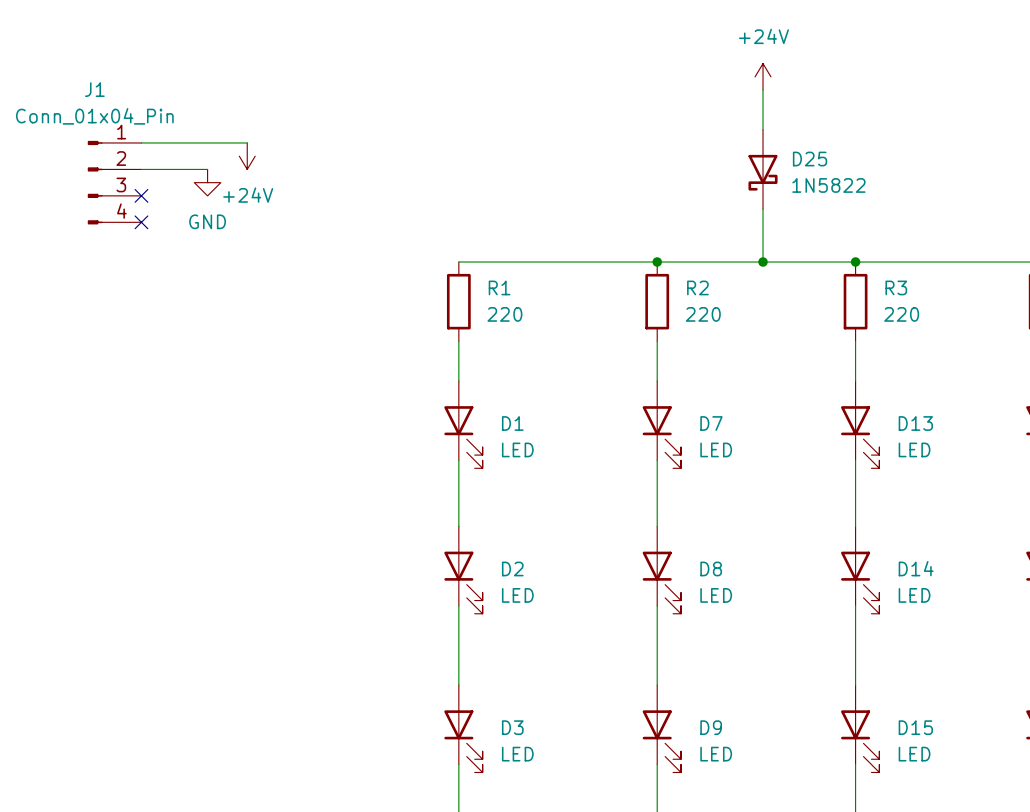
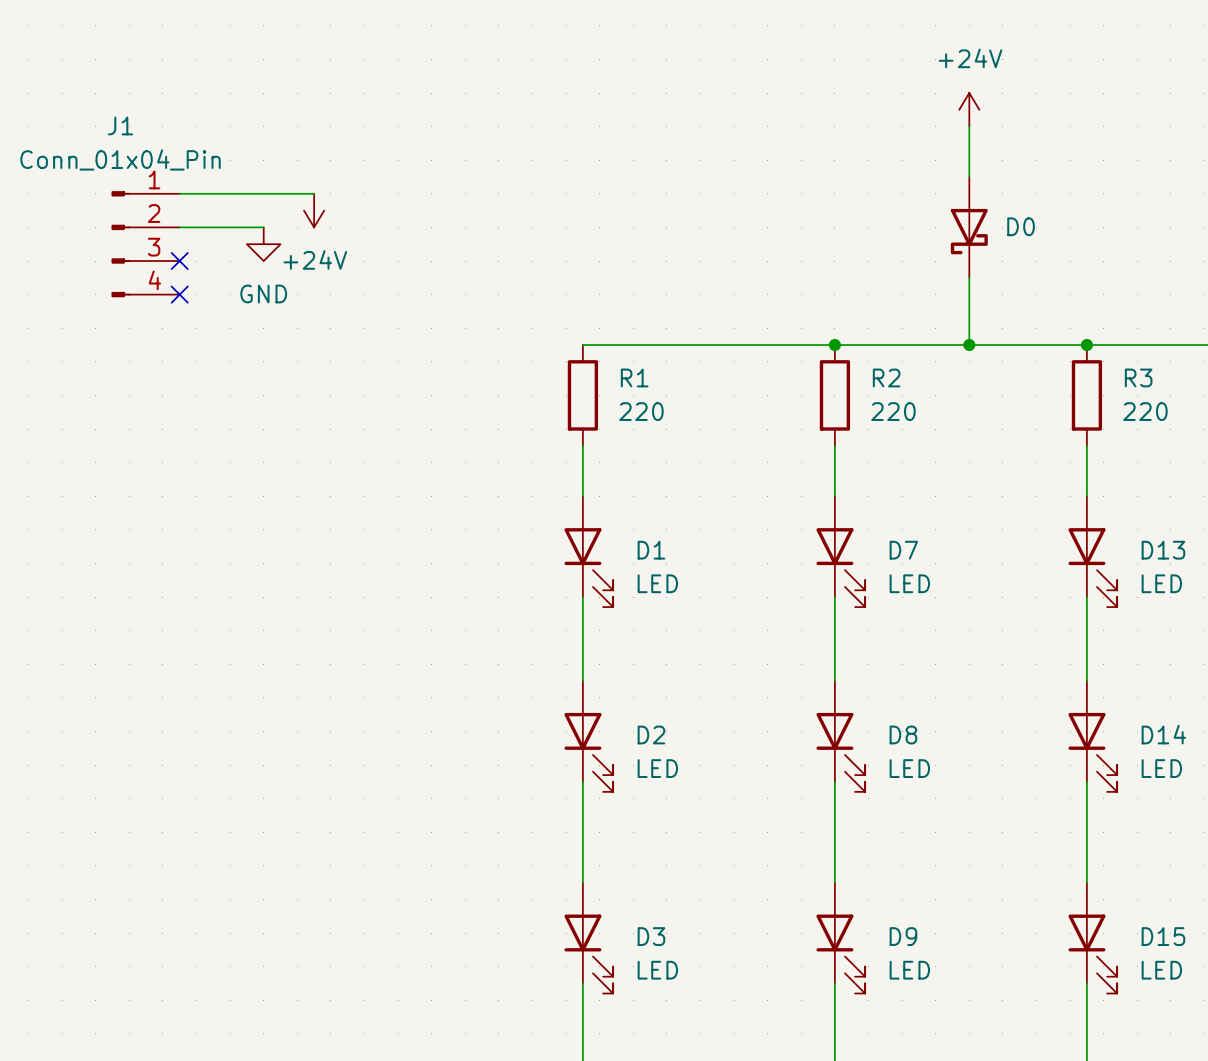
D25 name: D25 (810, 159) -> D0 (1021, 226)
D25 value: 1N5822 (828, 185) -> none

